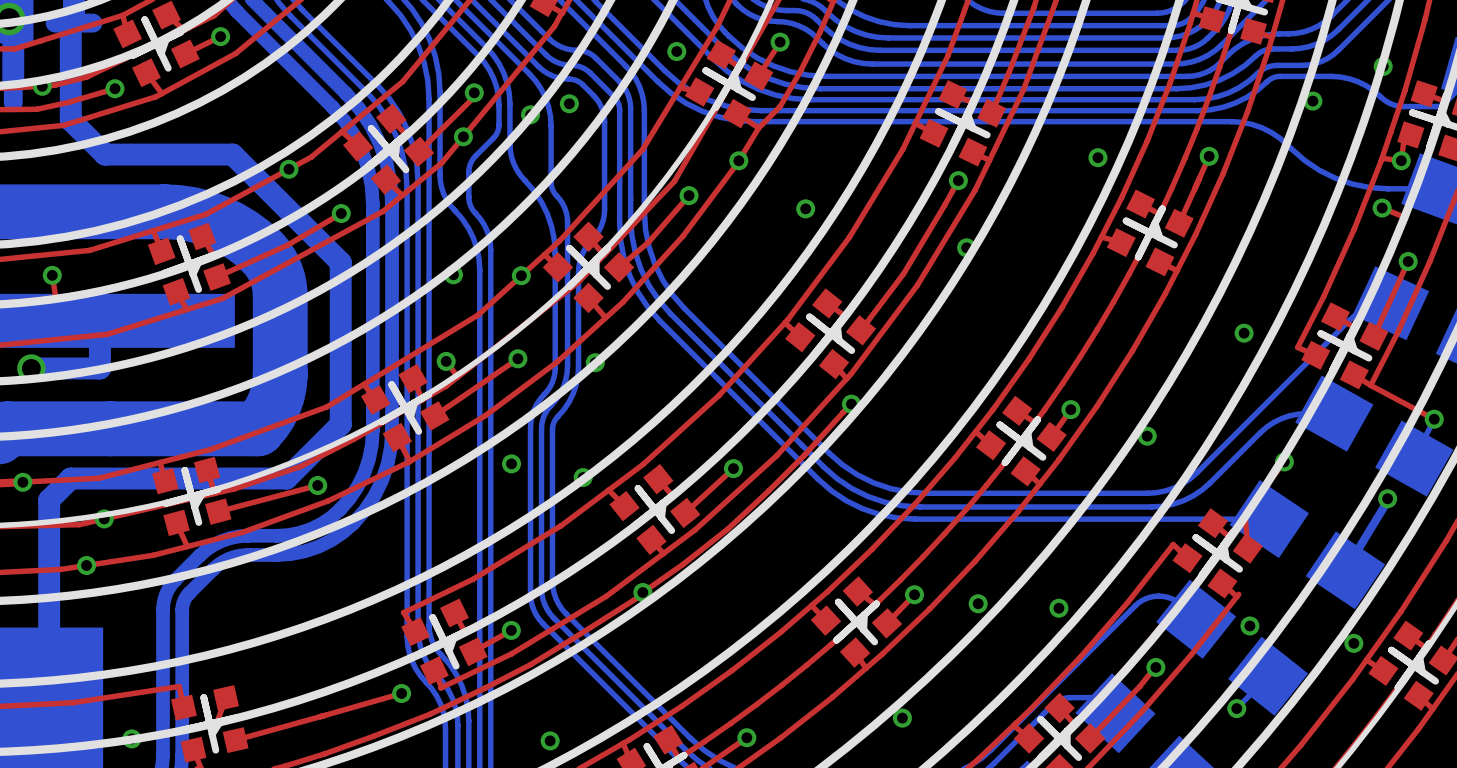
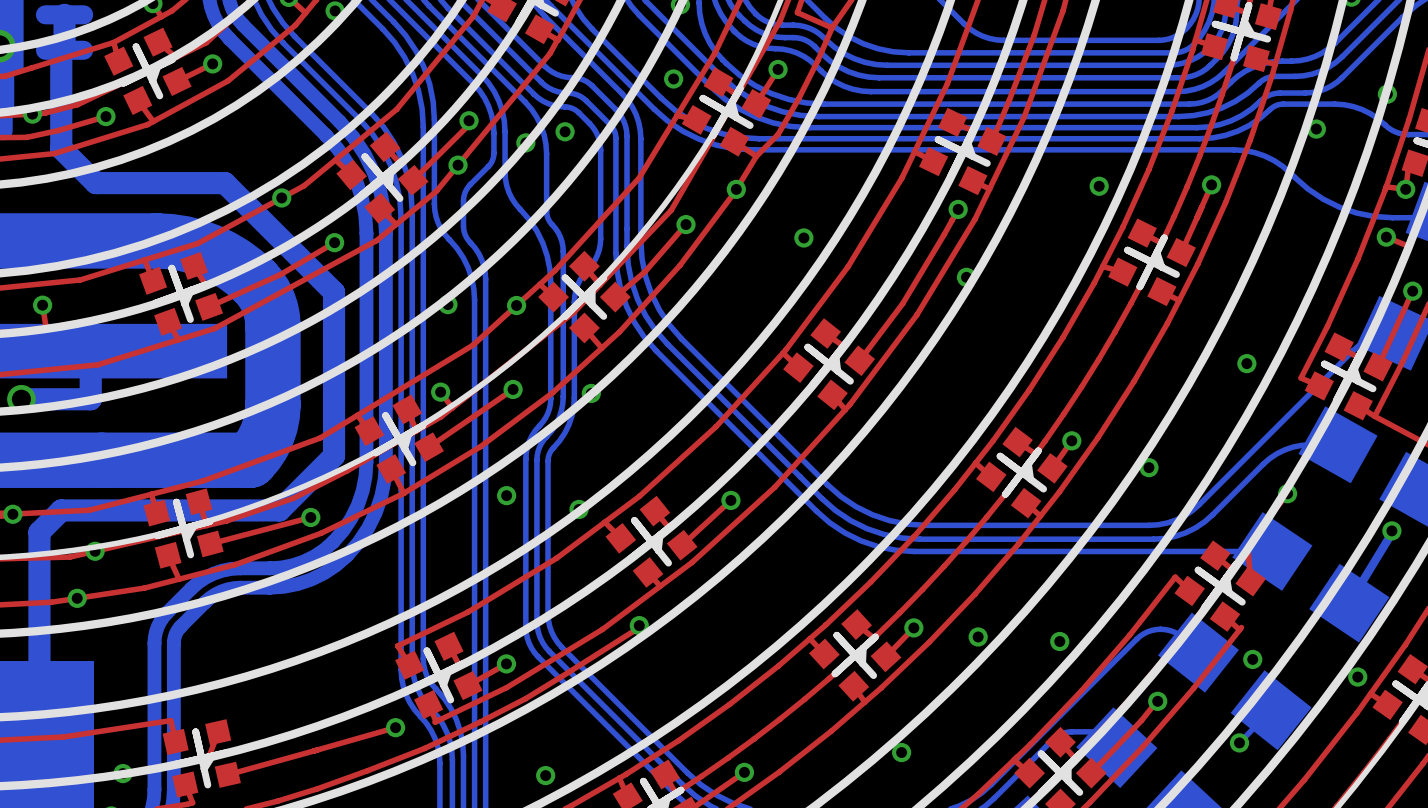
top track: (851, 404) (804, 454) (728, 528) (682, 564) (642, 592) -> none
via: (851, 404) -> none

